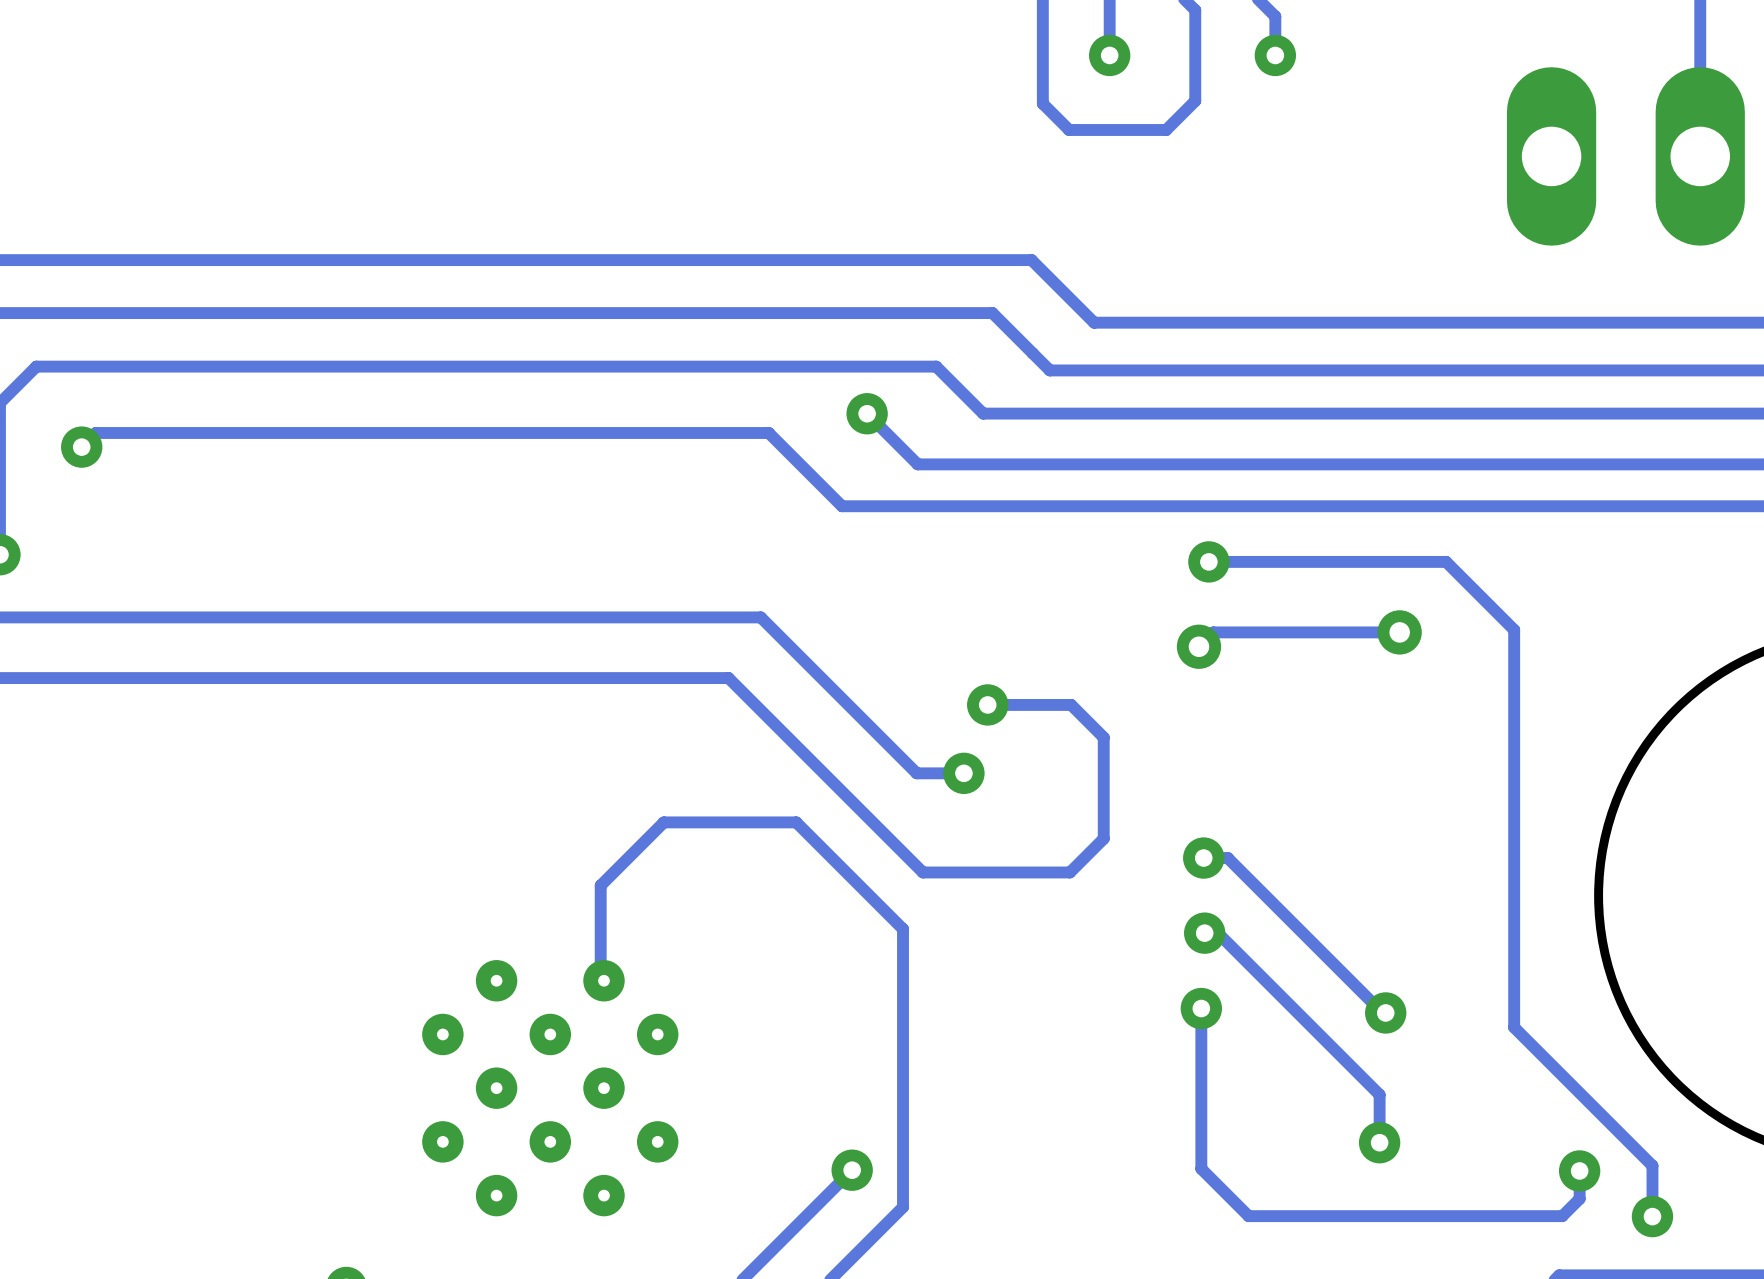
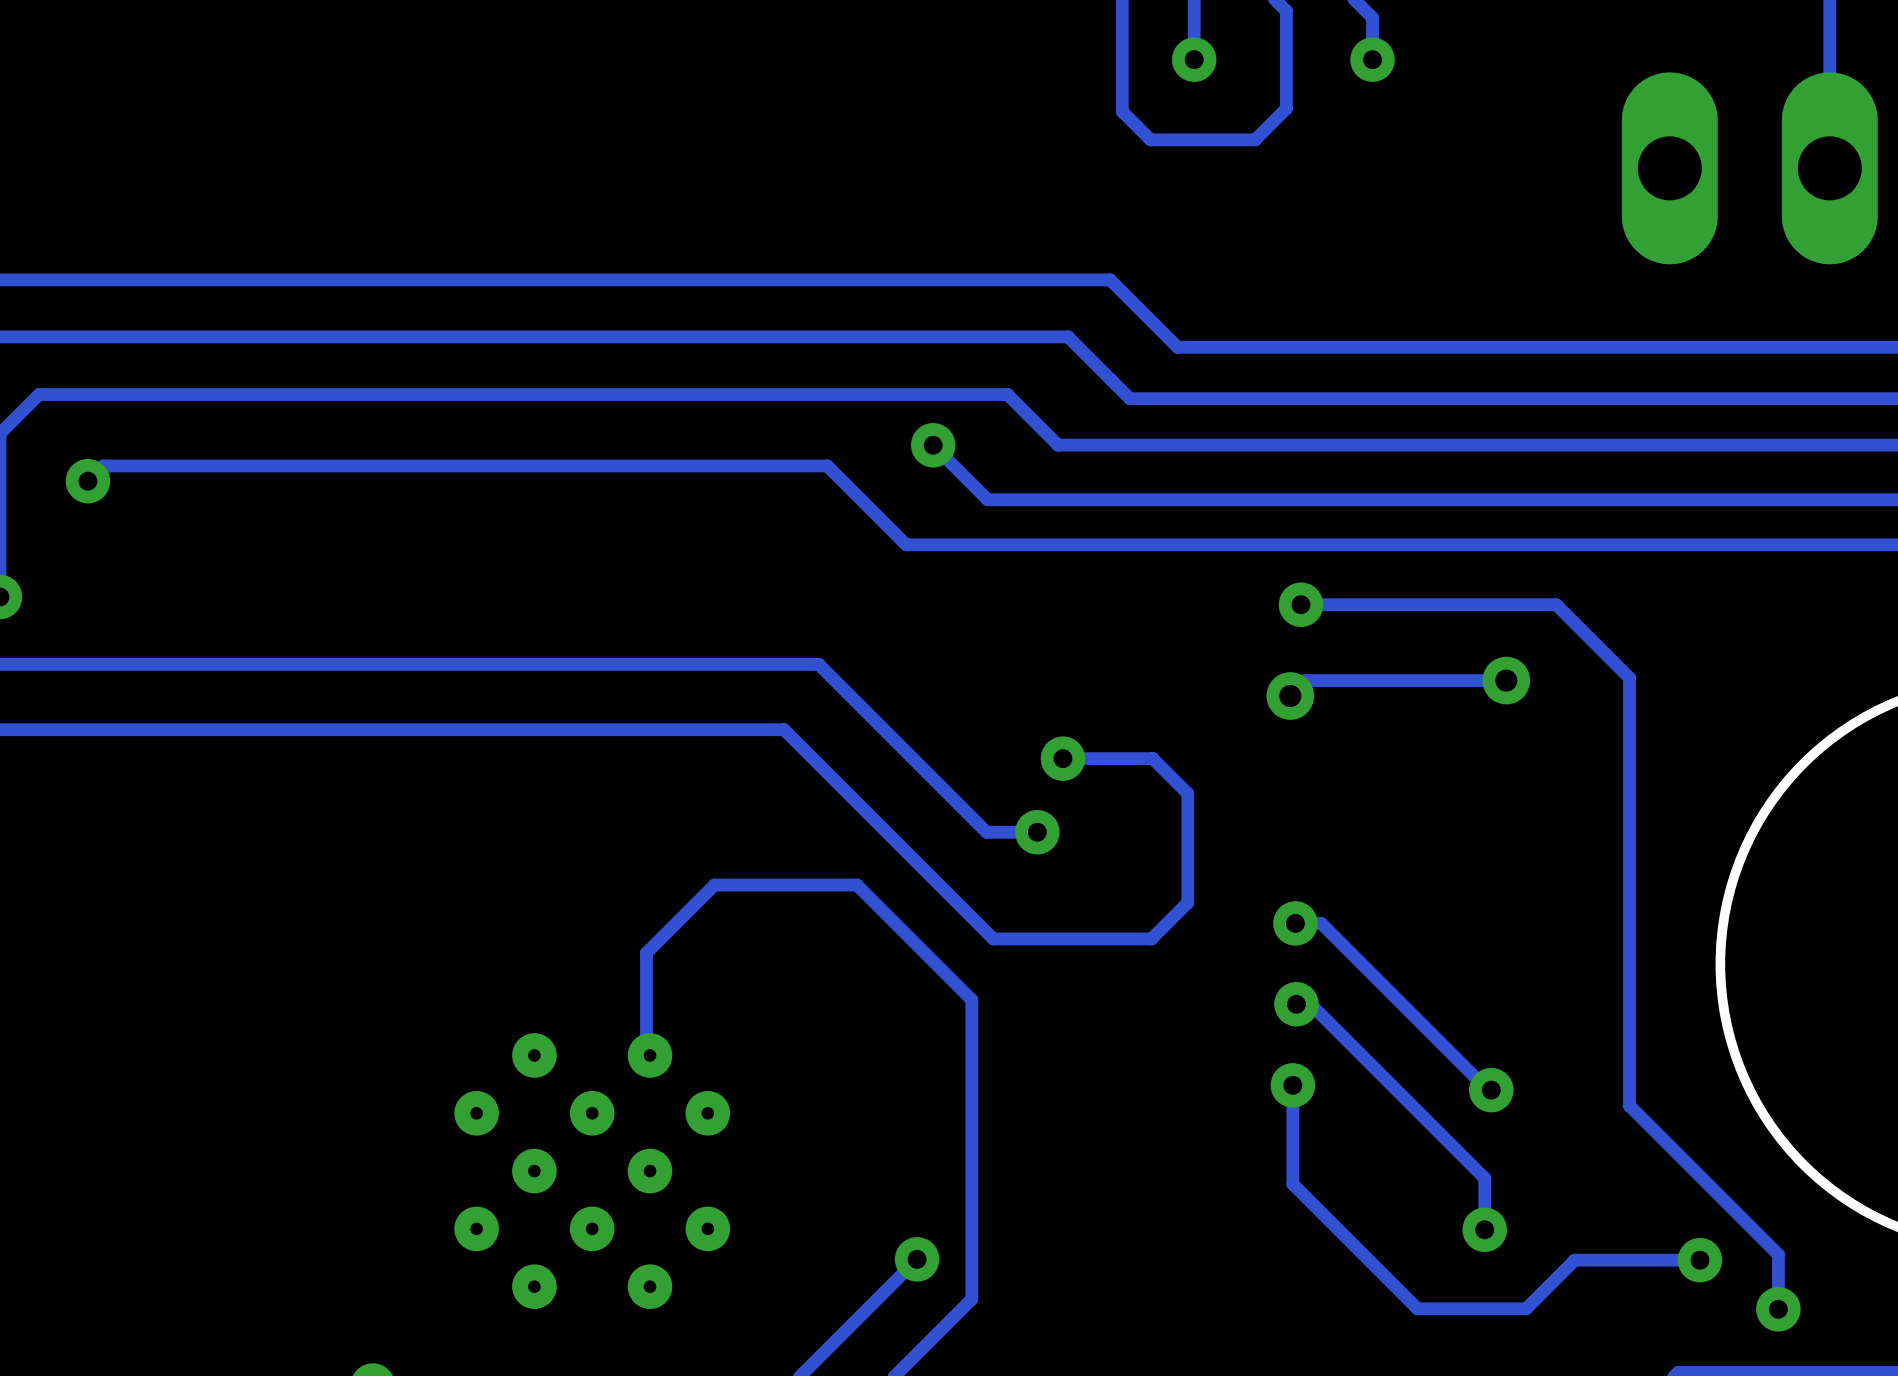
track: (1201, 1100) (1201, 1168) (1248, 1216) (1317, 1216) -> (1292, 1184) (1417, 1308)
track: (1579, 1170) (1579, 1198) (1562, 1216) (1418, 1216) -> (1699, 1260) (1574, 1260) (1526, 1308)

